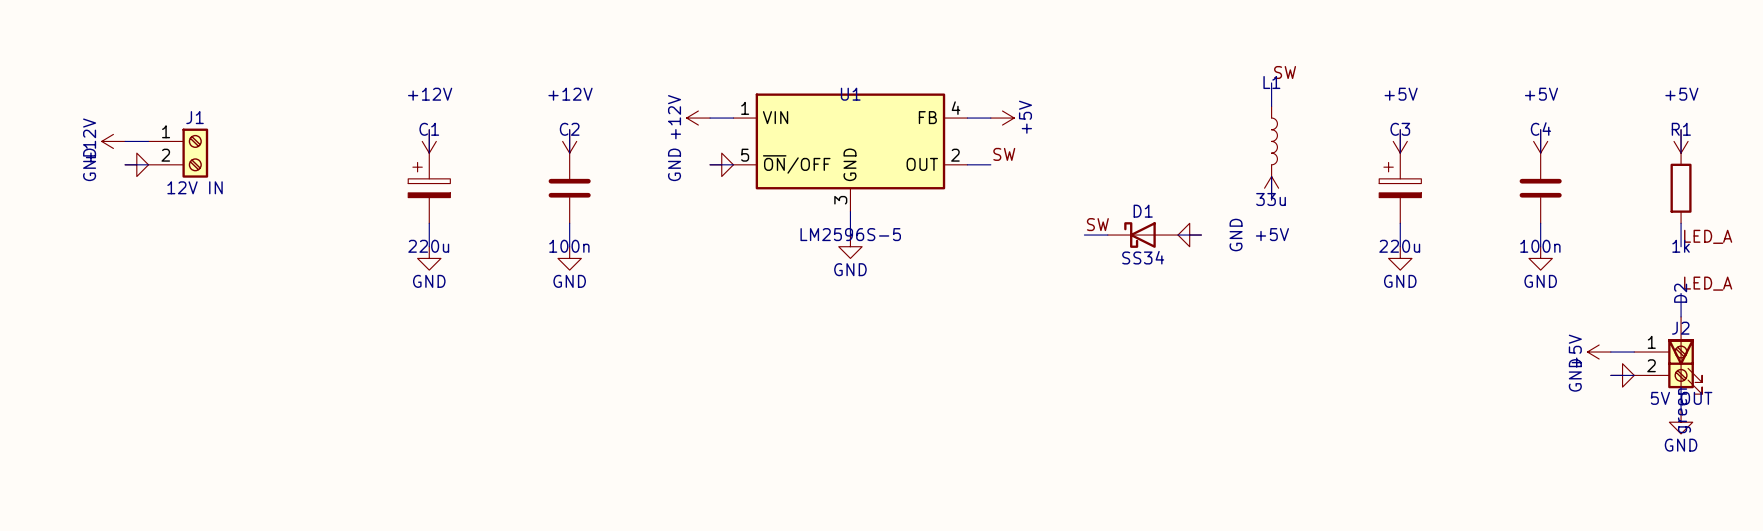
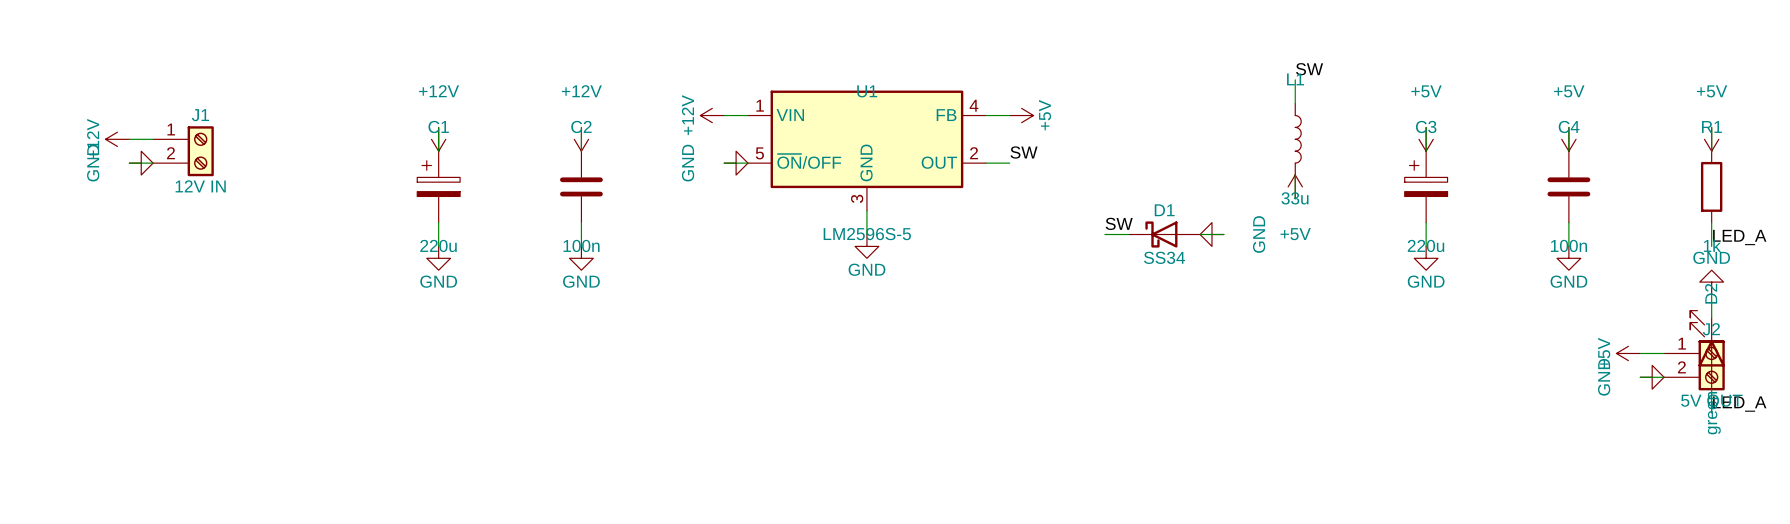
label position: LED_A (1708, 283) -> LED_A (1739, 404)
D2 rotation: 0° (1685, 366) -> 180° (1707, 338)
power symbol rotation: 0° (1681, 422) -> 180° (1711, 282)
power symbol position: GND (1681, 422) -> GND (1711, 282)

